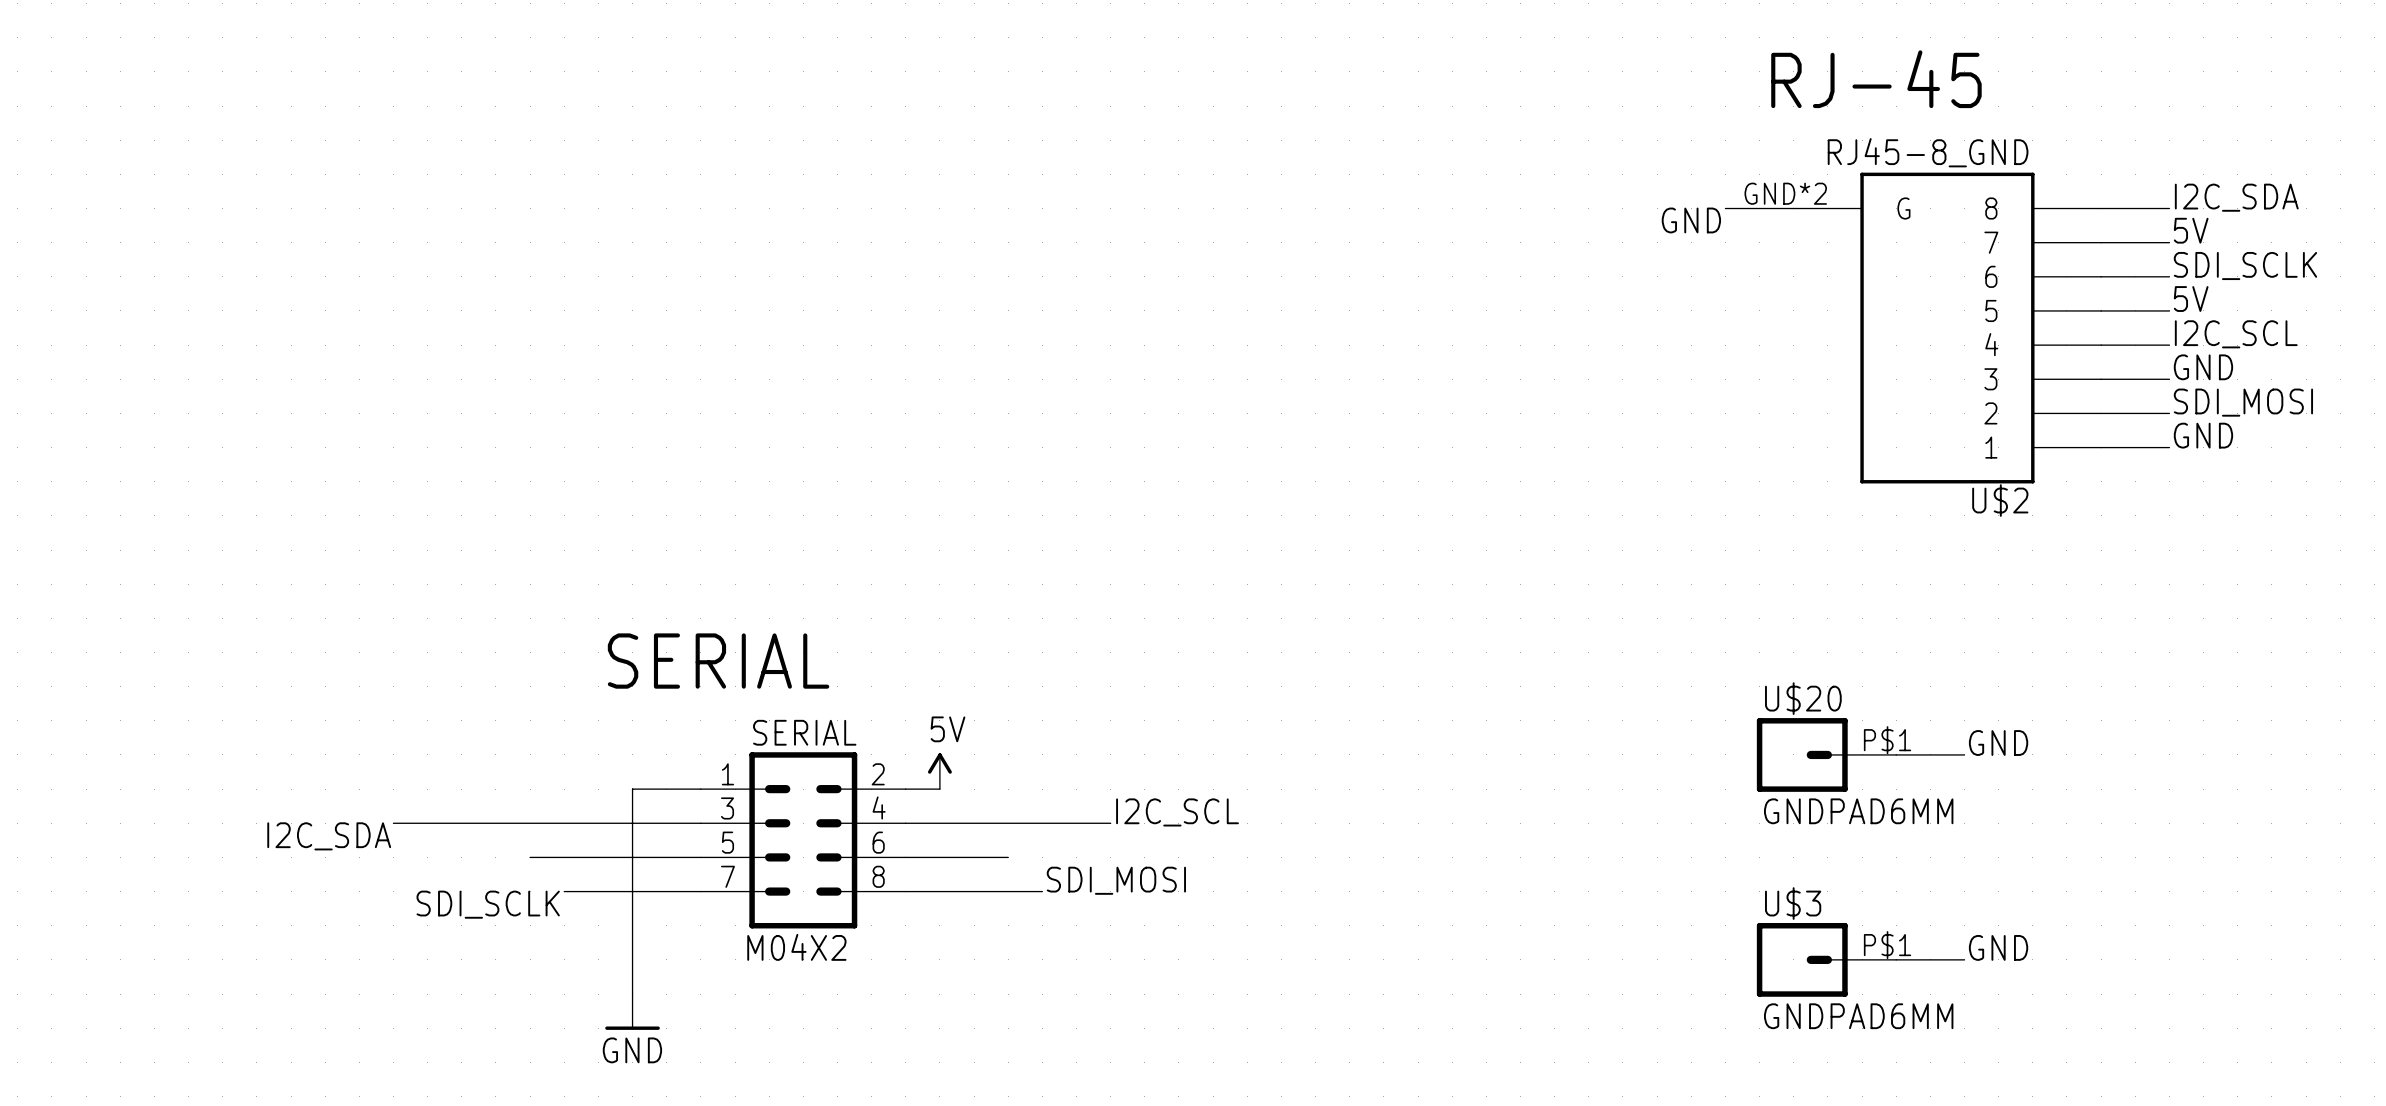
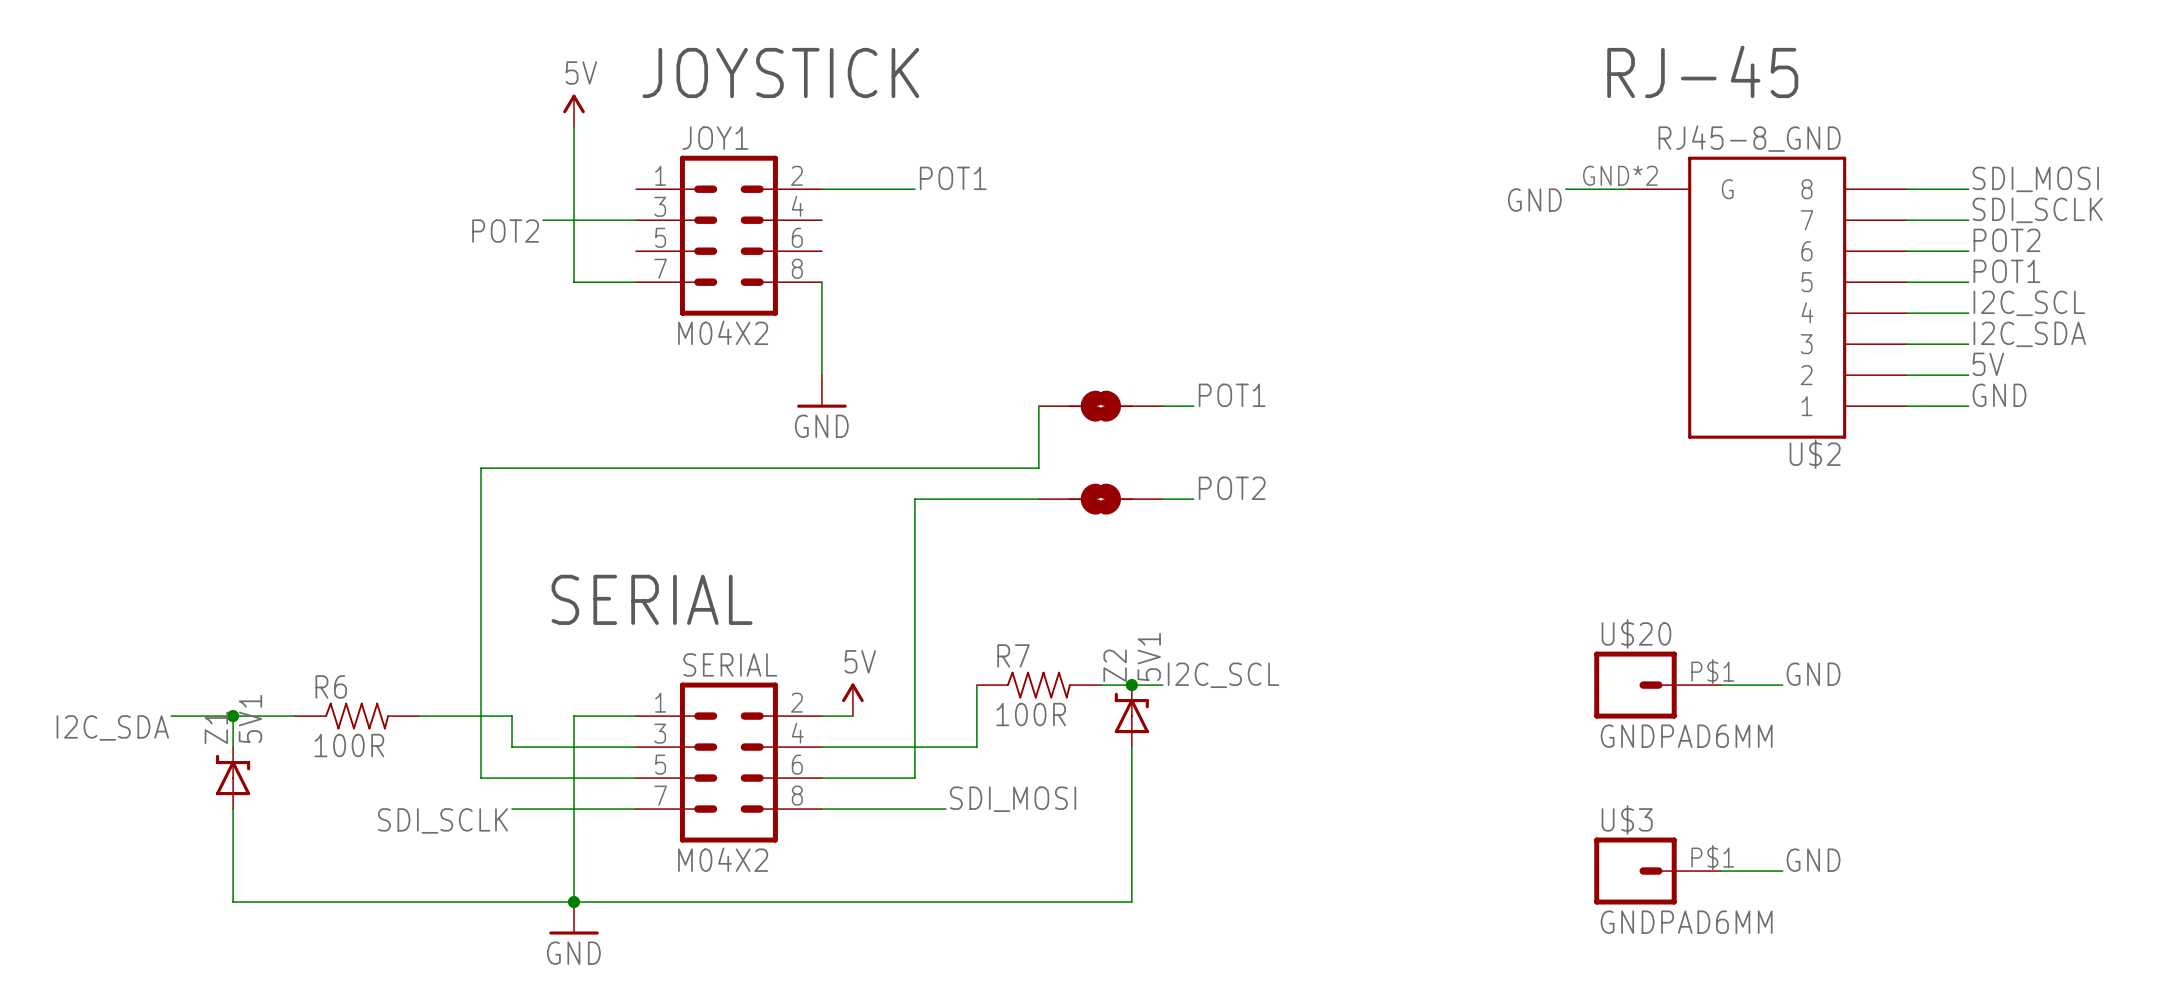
text: none -> JOYSTICK (780, 72)
power symbol: none -> 5V (573, 110)
wire: none -> (573, 127) (573, 282) (635, 282)
label: none -> POT1 (953, 178)
label: I2C_SDA (2236, 197) -> SDI_MOSI (2035, 179)
wire: none -> (821, 189) (914, 189)
label: 5V (2191, 230) -> SDI_SCLK (2037, 210)
wire: none -> (543, 220) (635, 220)
label: none -> POT2 (505, 231)
JOY1: none -> M04X2 (728, 235)
label: SDI_SCLK (2245, 266) -> POT2 (2006, 240)
label: 5V (2191, 299) -> POT1 (2006, 271)
wire: none -> (821, 282) (821, 375)
label: GND (2203, 367) -> I2C_SDA (2029, 334)
label: SDI_MOSI (2243, 402) -> 5V (1988, 364)
power symbol: none -> GND (821, 391)
label: none -> POT1 (1232, 395)
wire: none -> (1038, 406) (1038, 468) (481, 468) (481, 778)
part: none -> (1100, 406)
wire: none -> (1162, 406) (1193, 406)
label: none -> POT2 (1232, 488)
wire: none -> (1038, 499) (914, 499) (914, 778)
part: none -> (1100, 499)
wire: none -> (1162, 499) (1193, 499)
R7: none -> 100R (1038, 685)
wire: none -> (1100, 685) (1162, 685)
junction: none -> (1131, 685)
wire: none -> (171, 716) (295, 716)
wire: none -> (233, 716) (233, 747)
junction: none -> (233, 716)
R6: none -> 100R (357, 716)
Z2: none -> 5V1 (1131, 716)
label position: I2C_SCL (1177, 812) -> I2C_SCL (1223, 675)
wire: (393, 823) (564, 823) -> (419, 716) (512, 716) (512, 747)
wire: (1076, 823) (1110, 823) -> (976, 747) (976, 685)
wire: none -> (1131, 747) (1131, 902) (233, 902) (233, 809)
label position: I2C_SDA (329, 836) -> I2C_SDA (112, 727)
Z1: none -> 5V1 (233, 778)
junction: none -> (573, 902)

